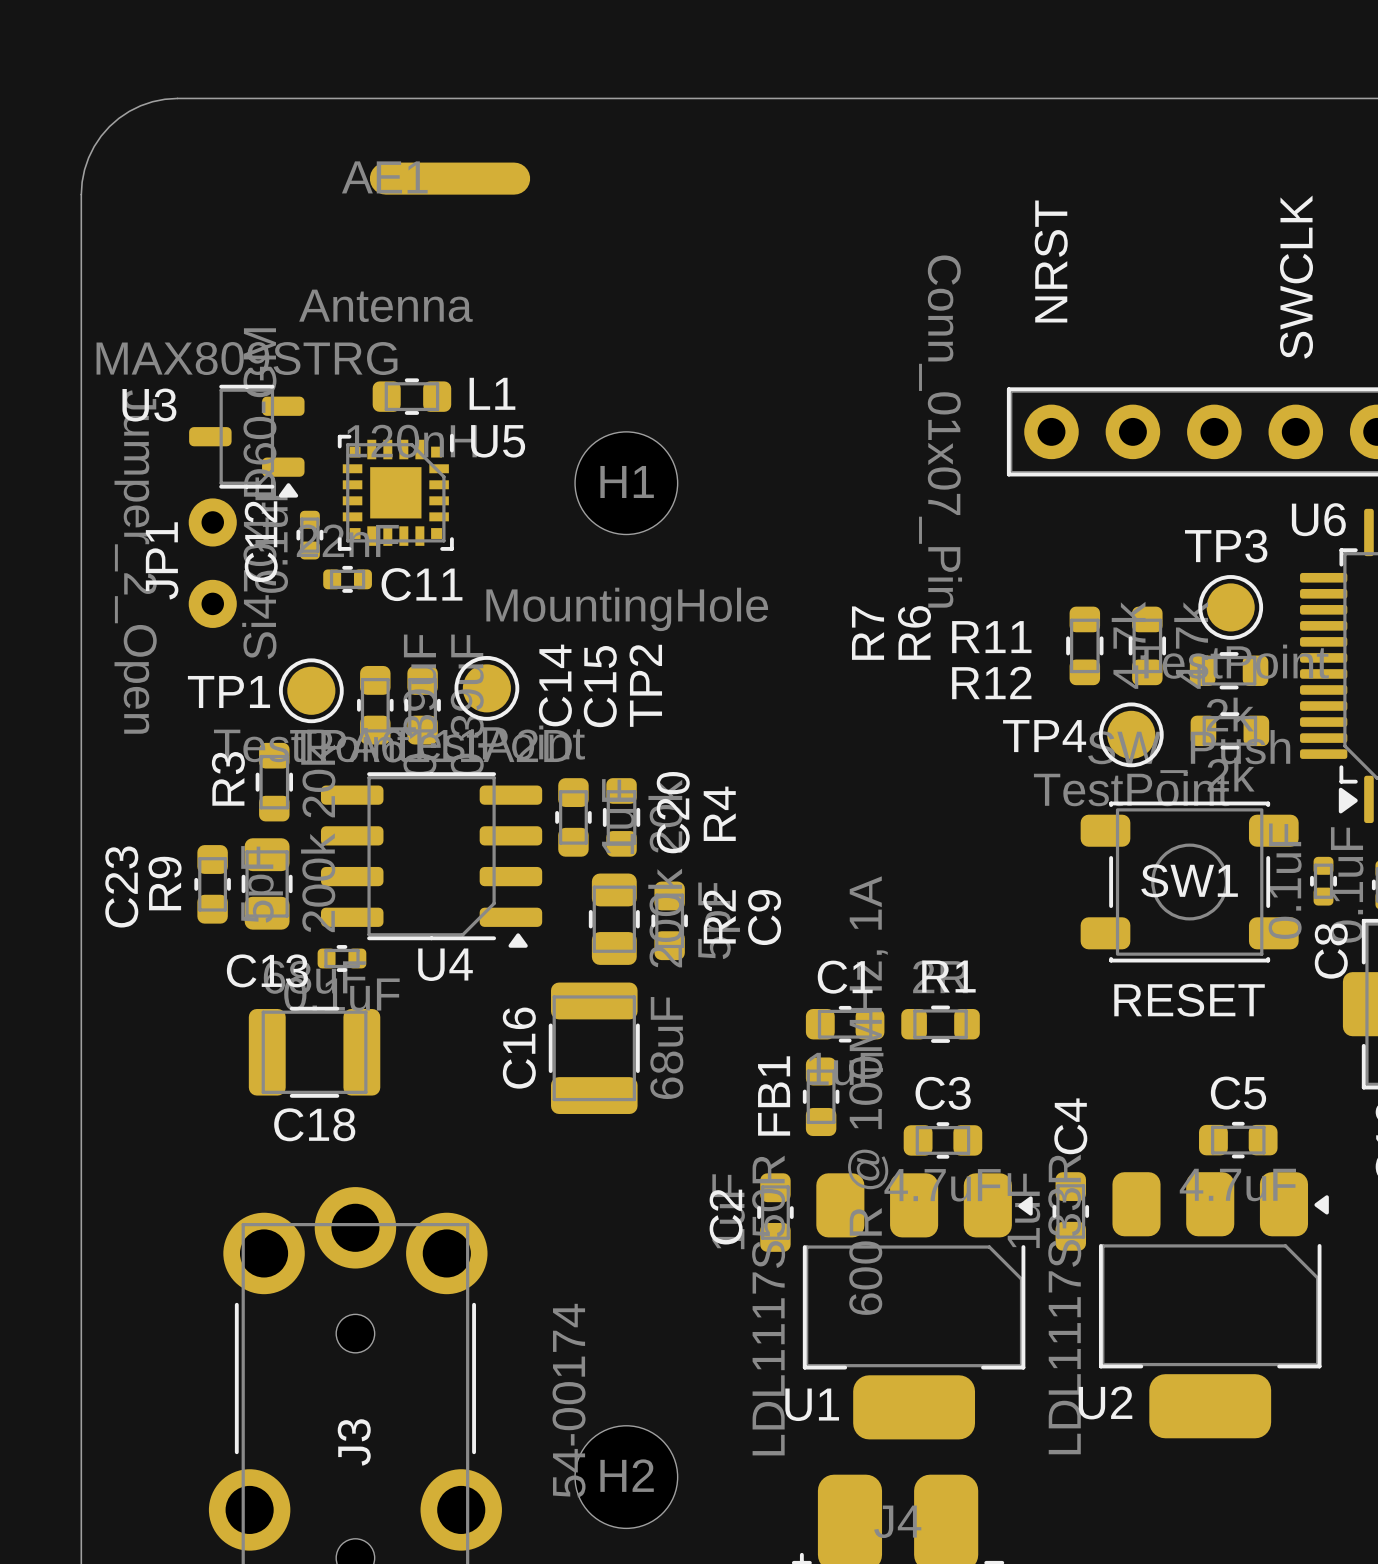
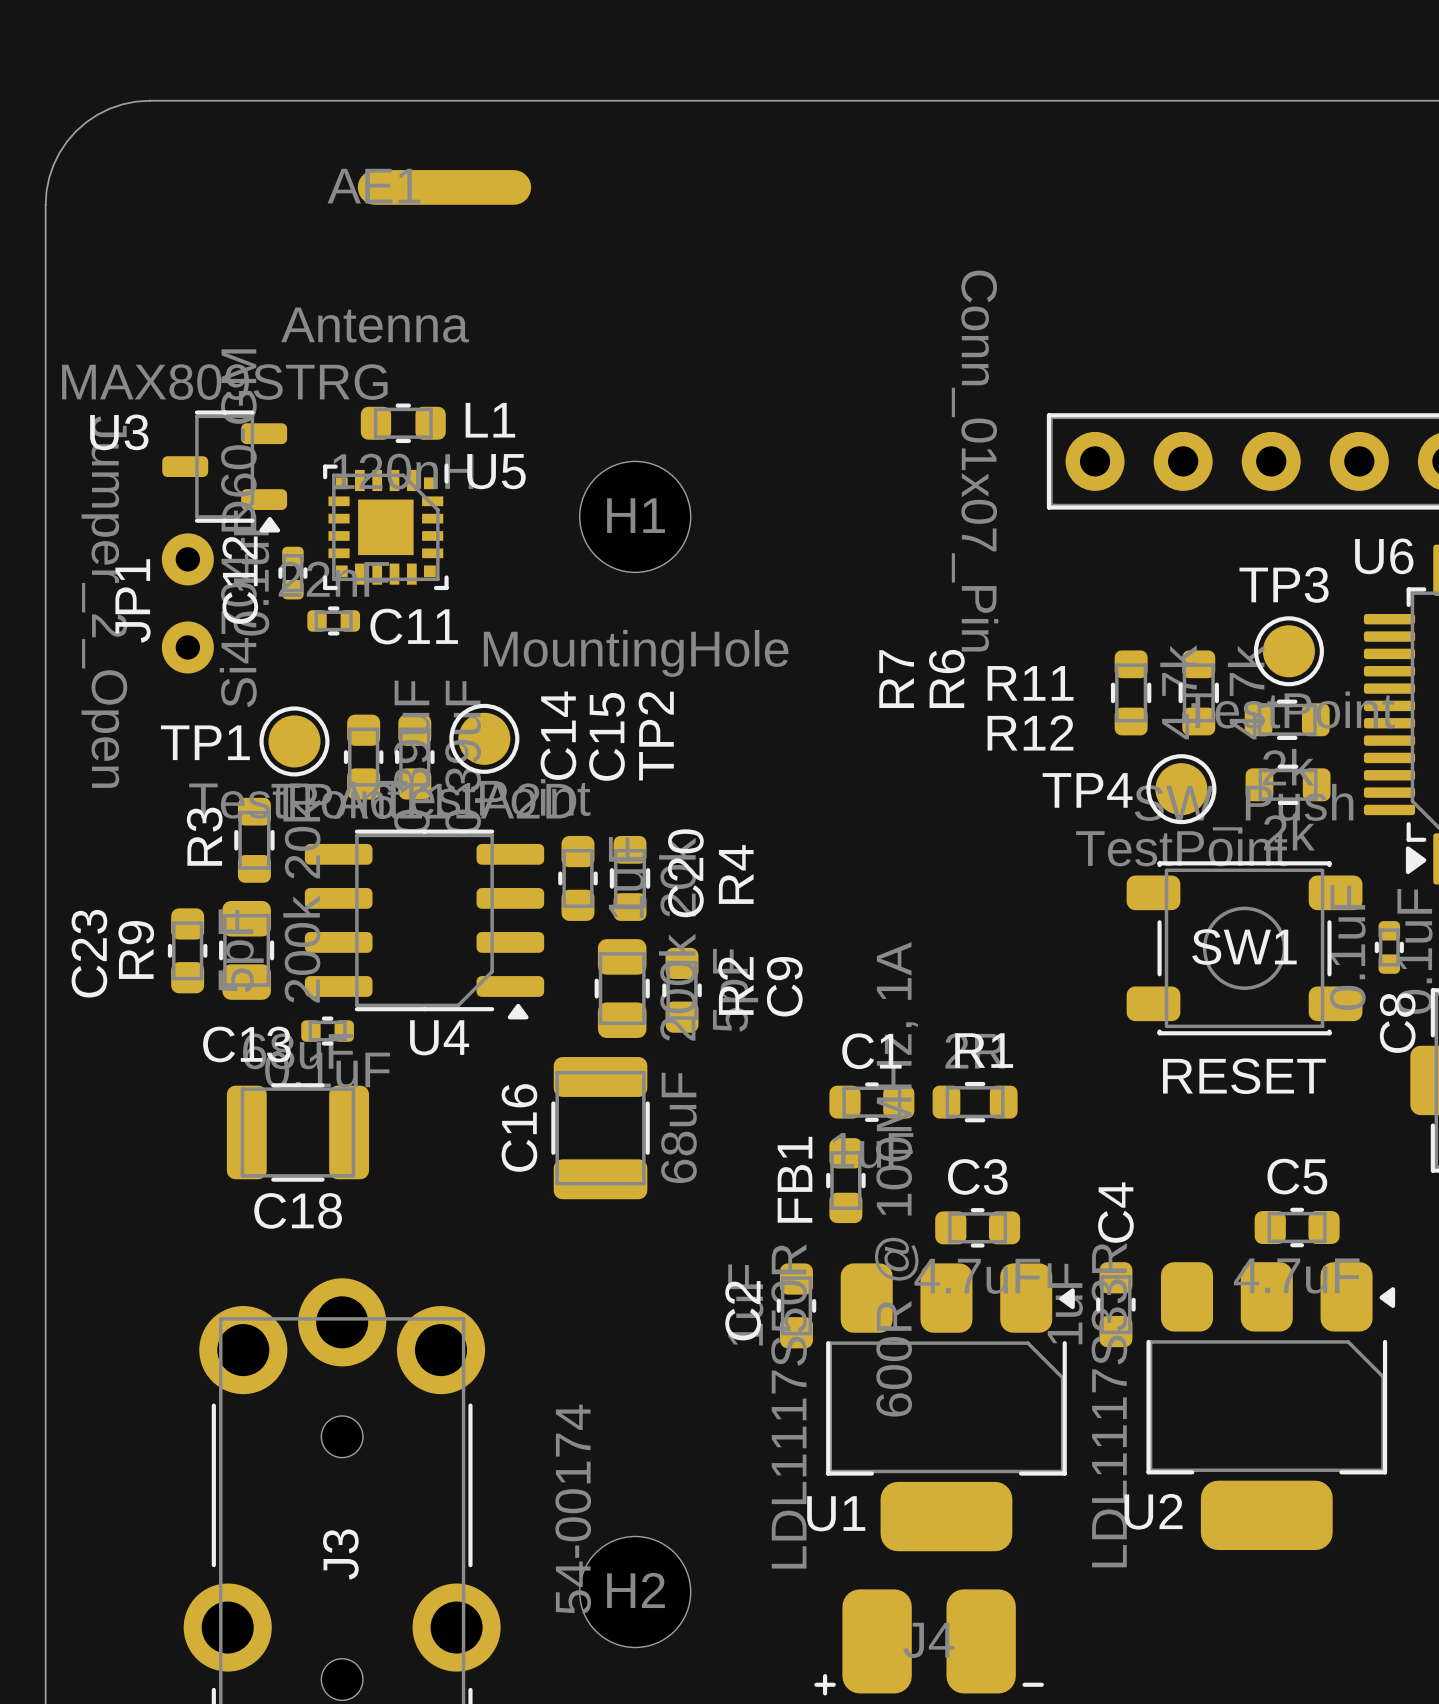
text: NRST (1051, 261) -> none
text: SWCLK (1296, 277) -> none

